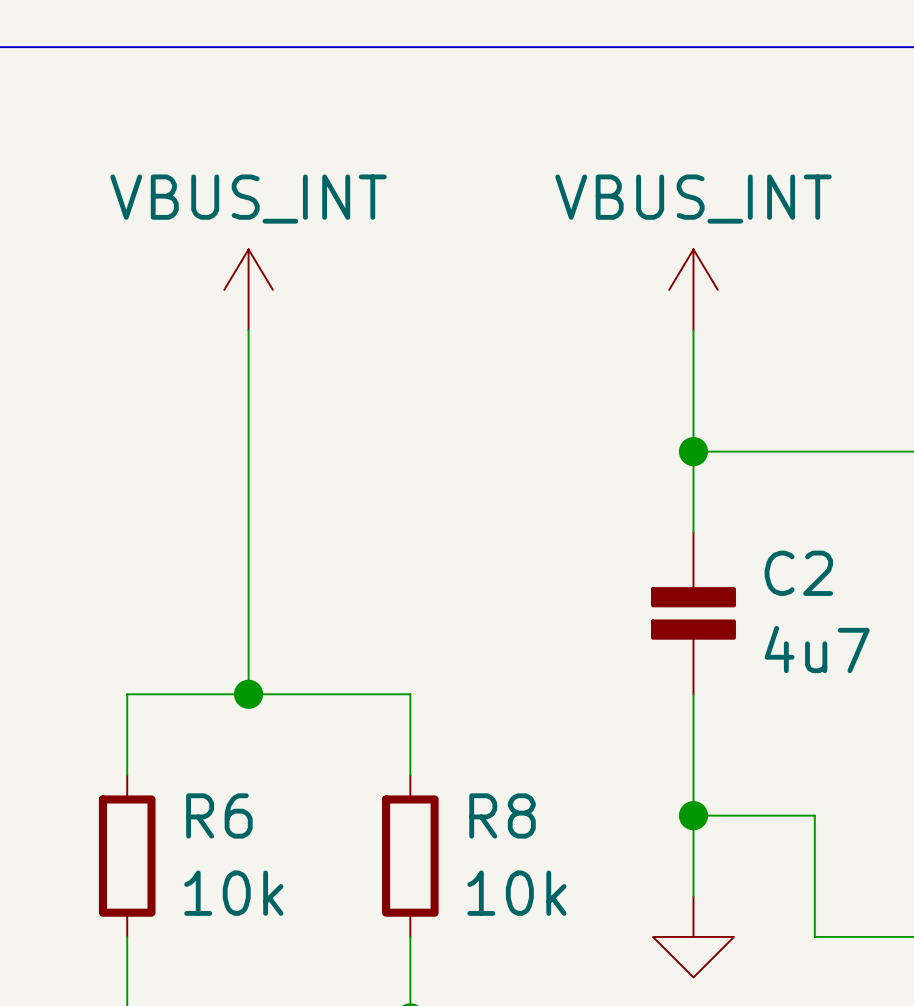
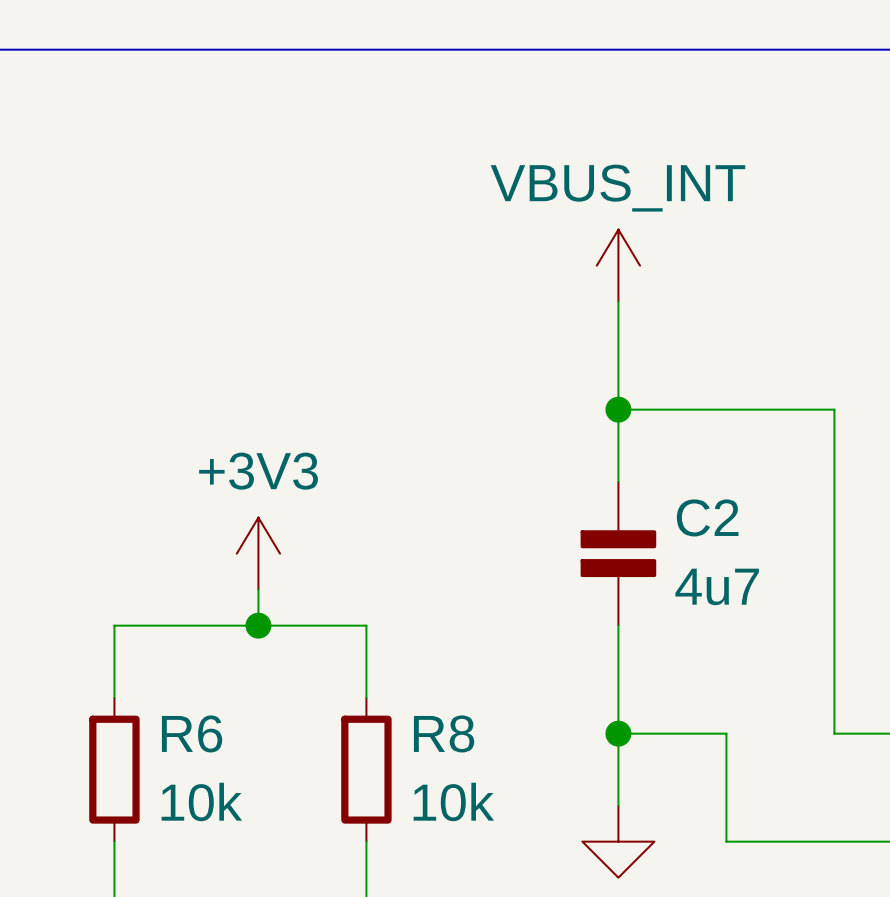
power symbol: VBUS_INT (248, 289) -> none
wire: (248, 330) (248, 694) -> none
power symbol: none -> +3V3 (258, 553)
wire: none -> (258, 589) (258, 625)
junction position: (248, 694) -> (258, 625)

